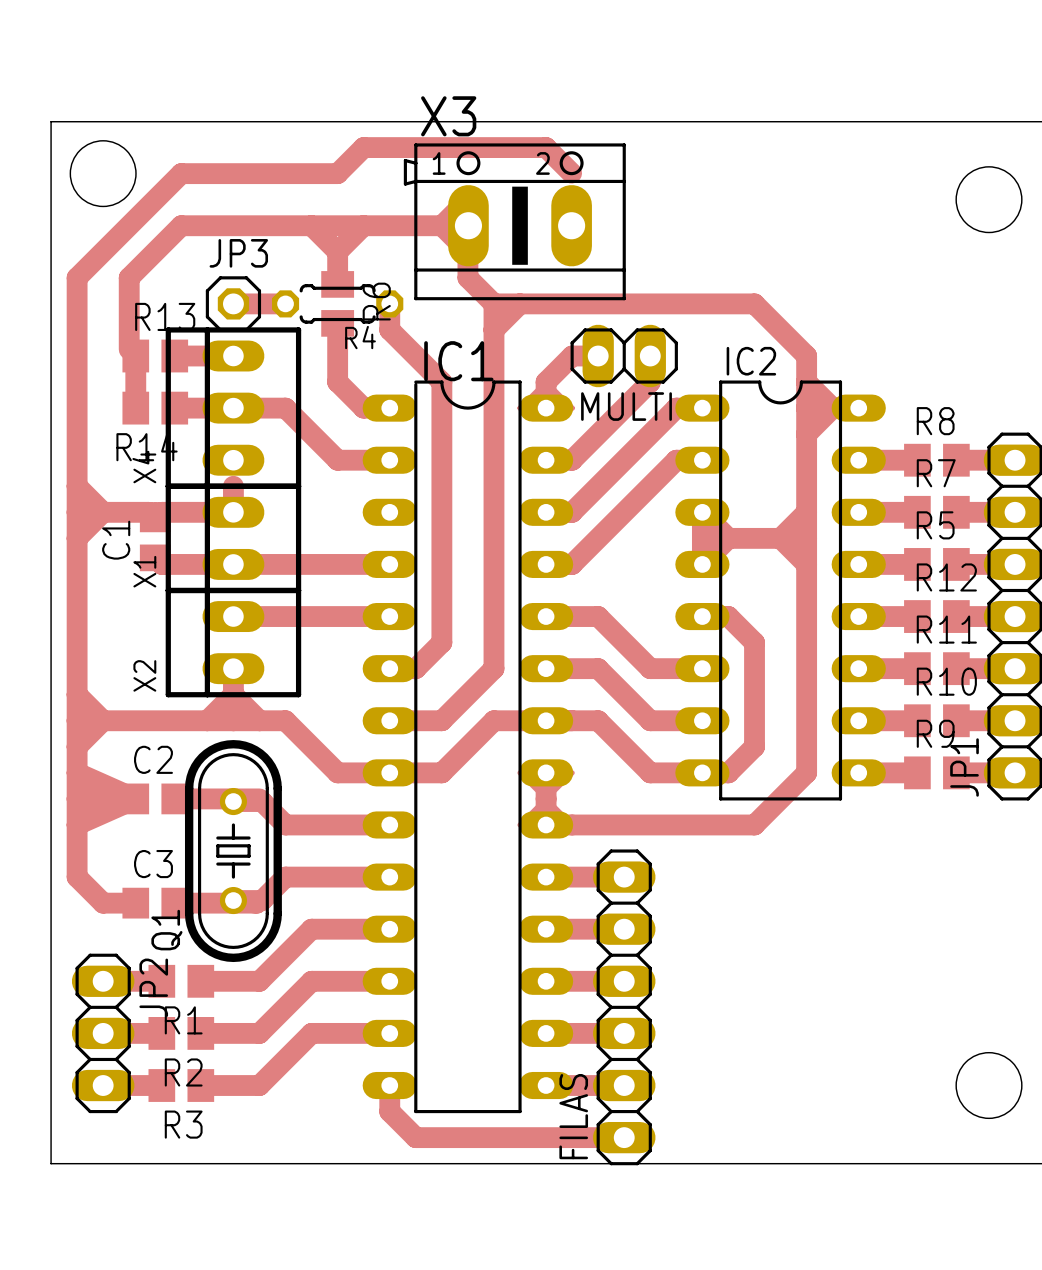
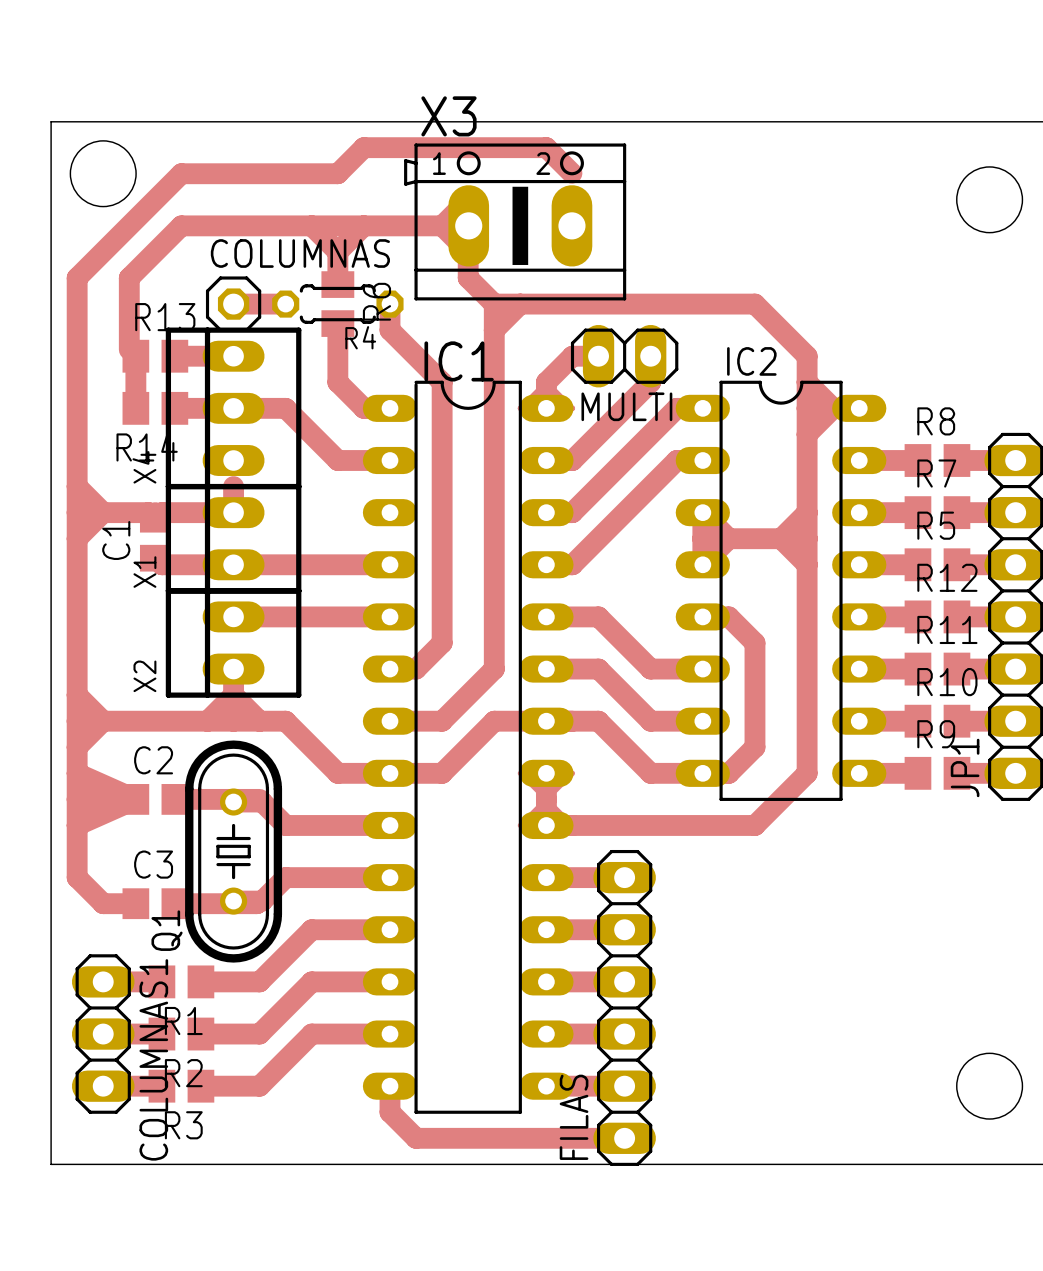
JP3 name: JP3 (238, 253) -> COLUMNAS (300, 253)
JP2 name: JP2 (153, 987) -> COLUMNAS1 (153, 1059)

